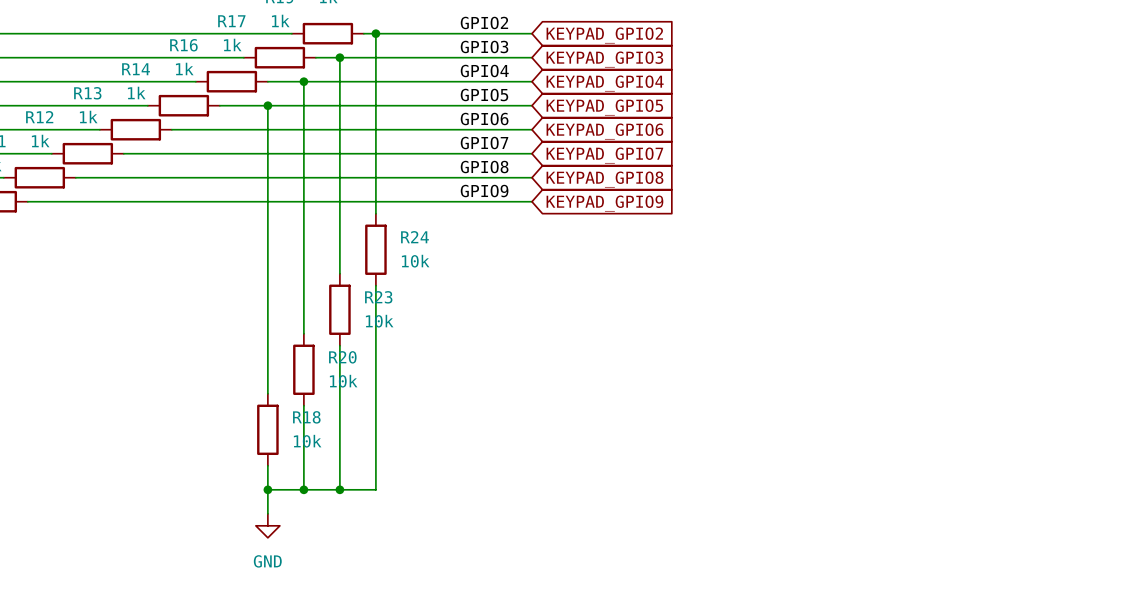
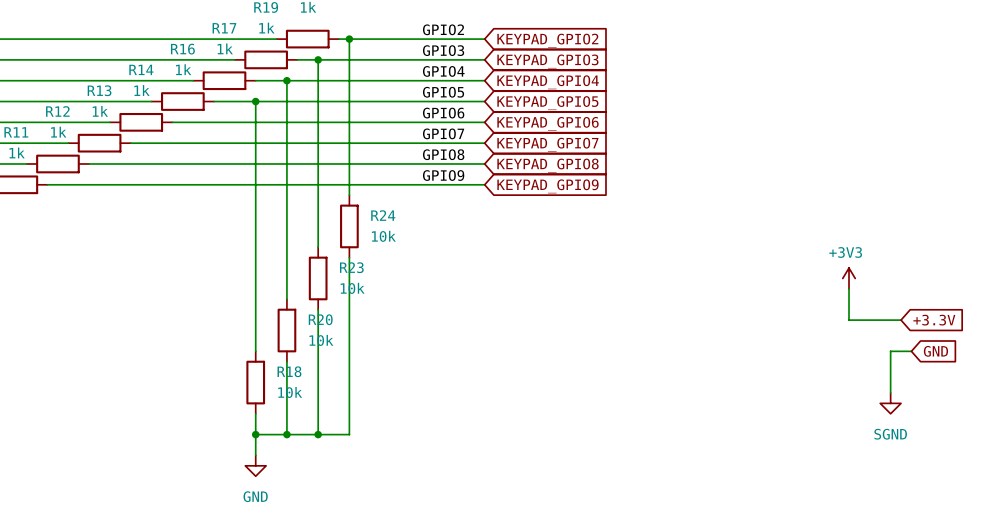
power symbol: none -> +3V3 (849, 278)
wire: none -> (849, 288) (849, 320) (901, 320)
global label: none -> +3.3V (934, 320)
wire: none -> (911, 351) (890, 351) (890, 392)
global label: none -> GND (935, 351)
power symbol: none -> SGND (890, 403)

